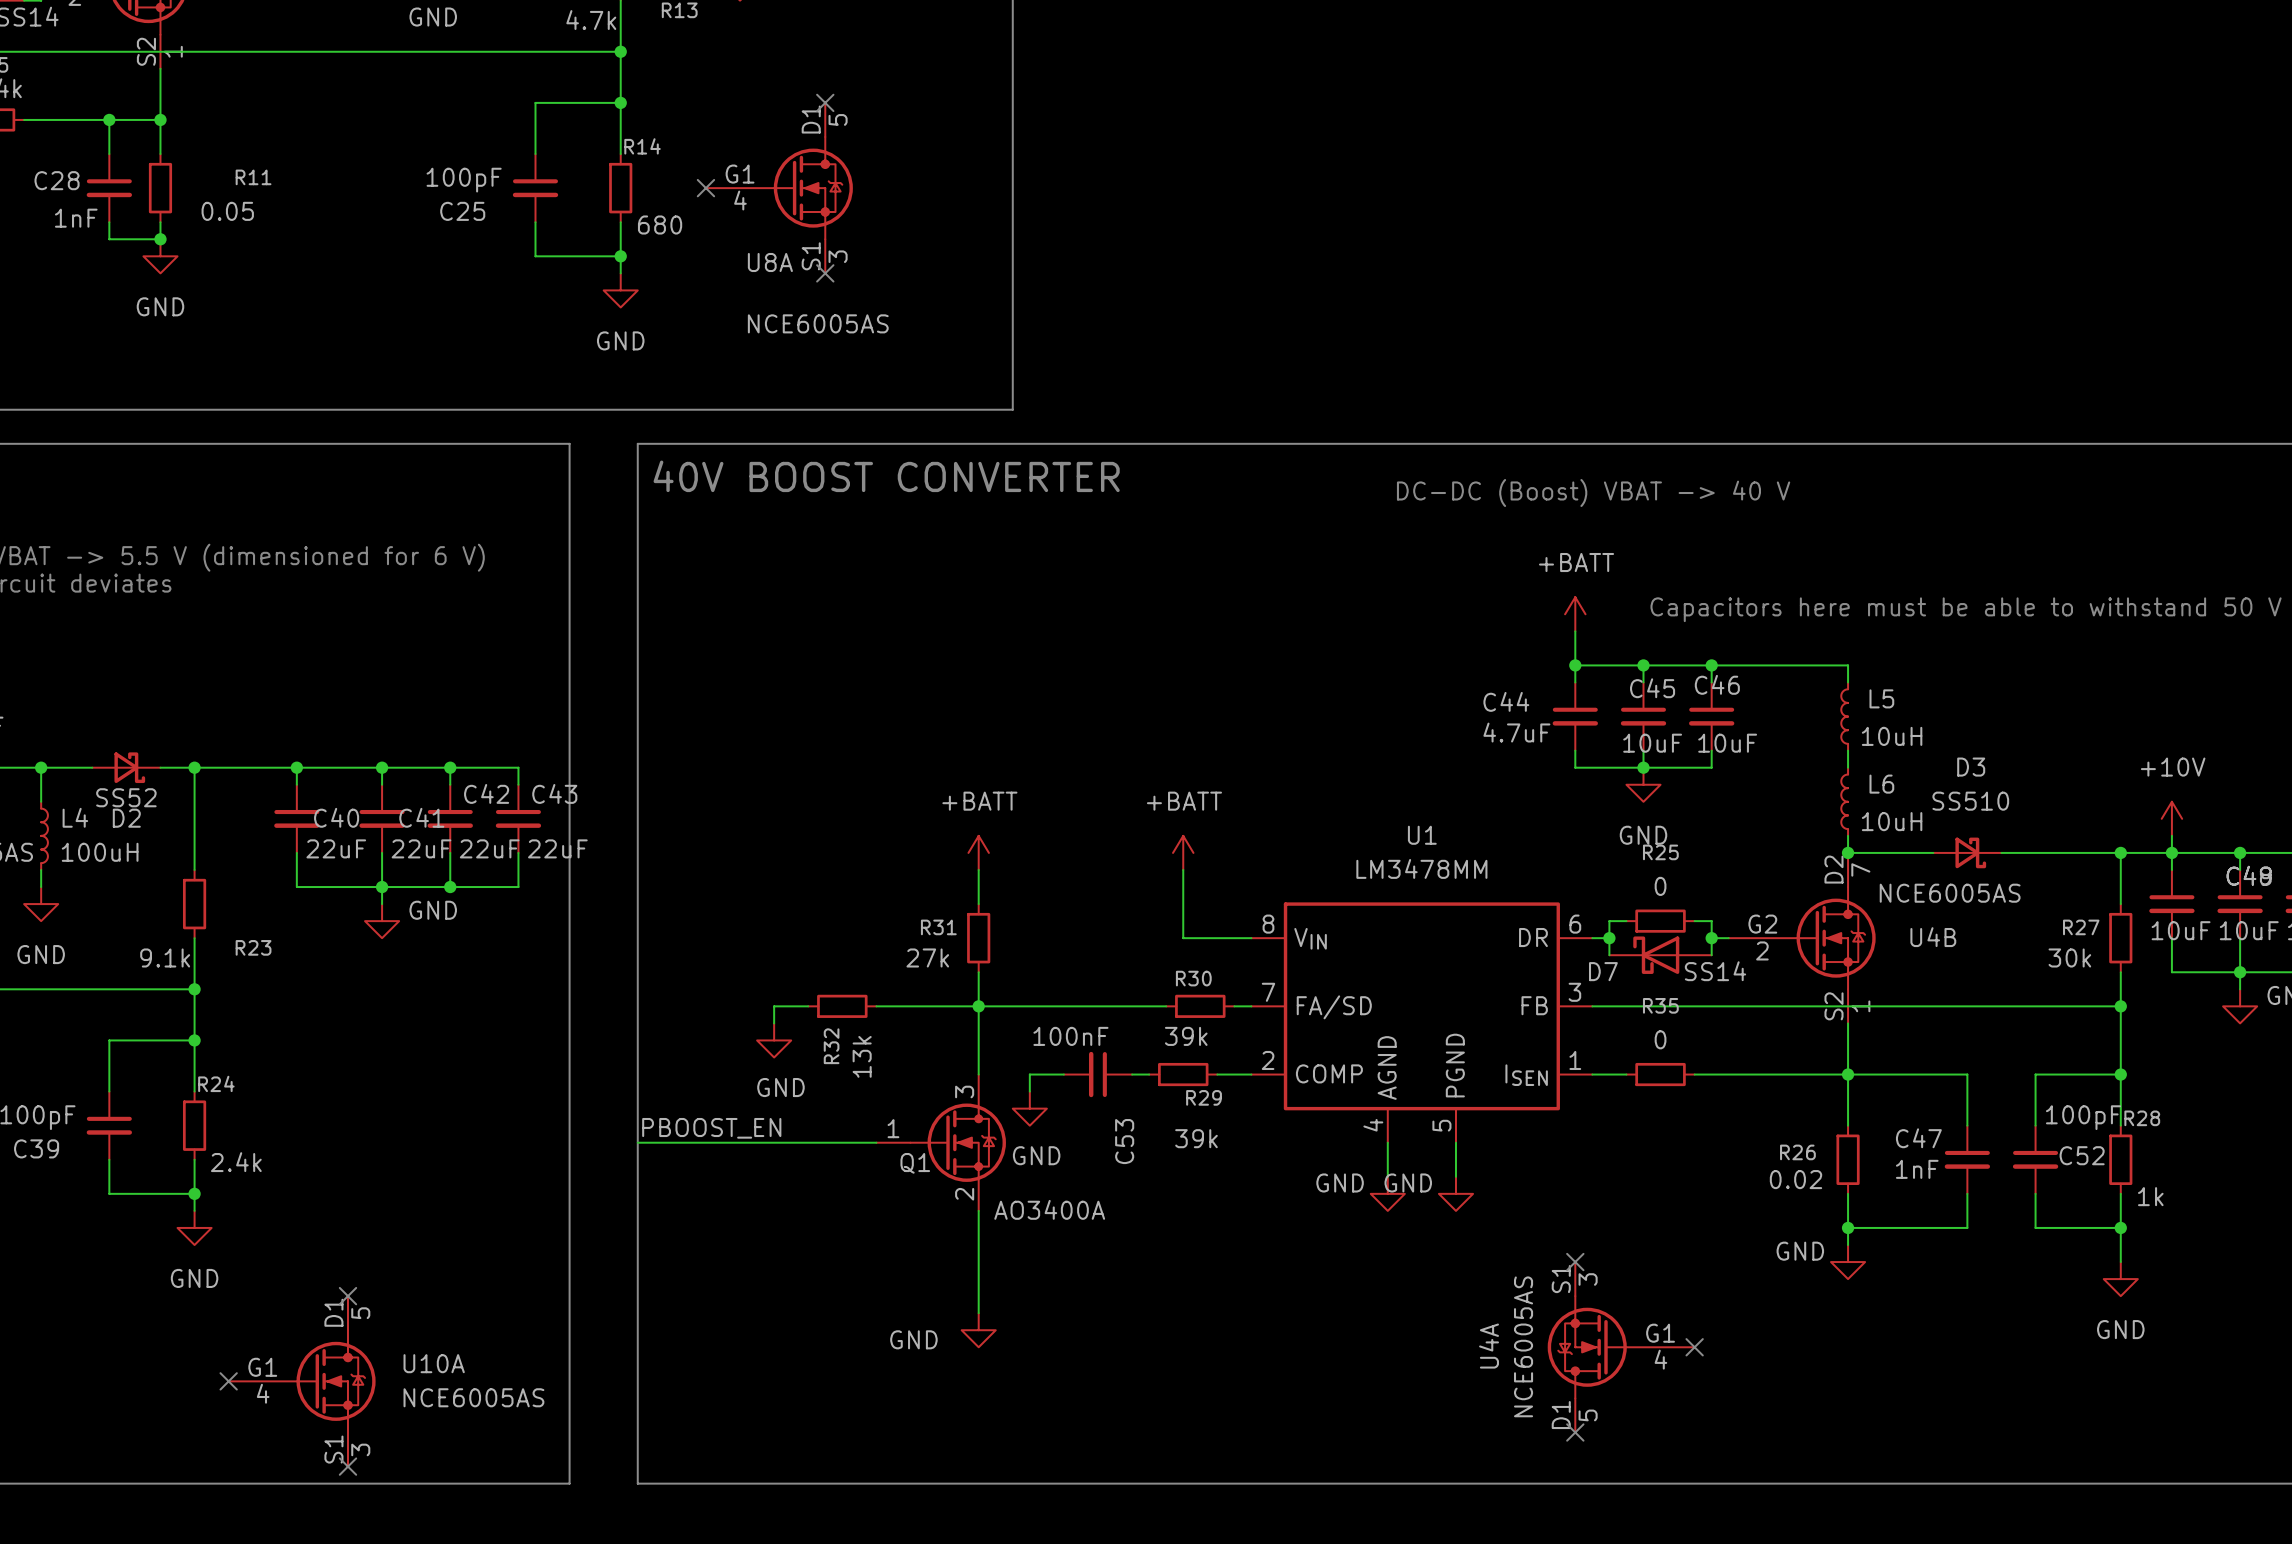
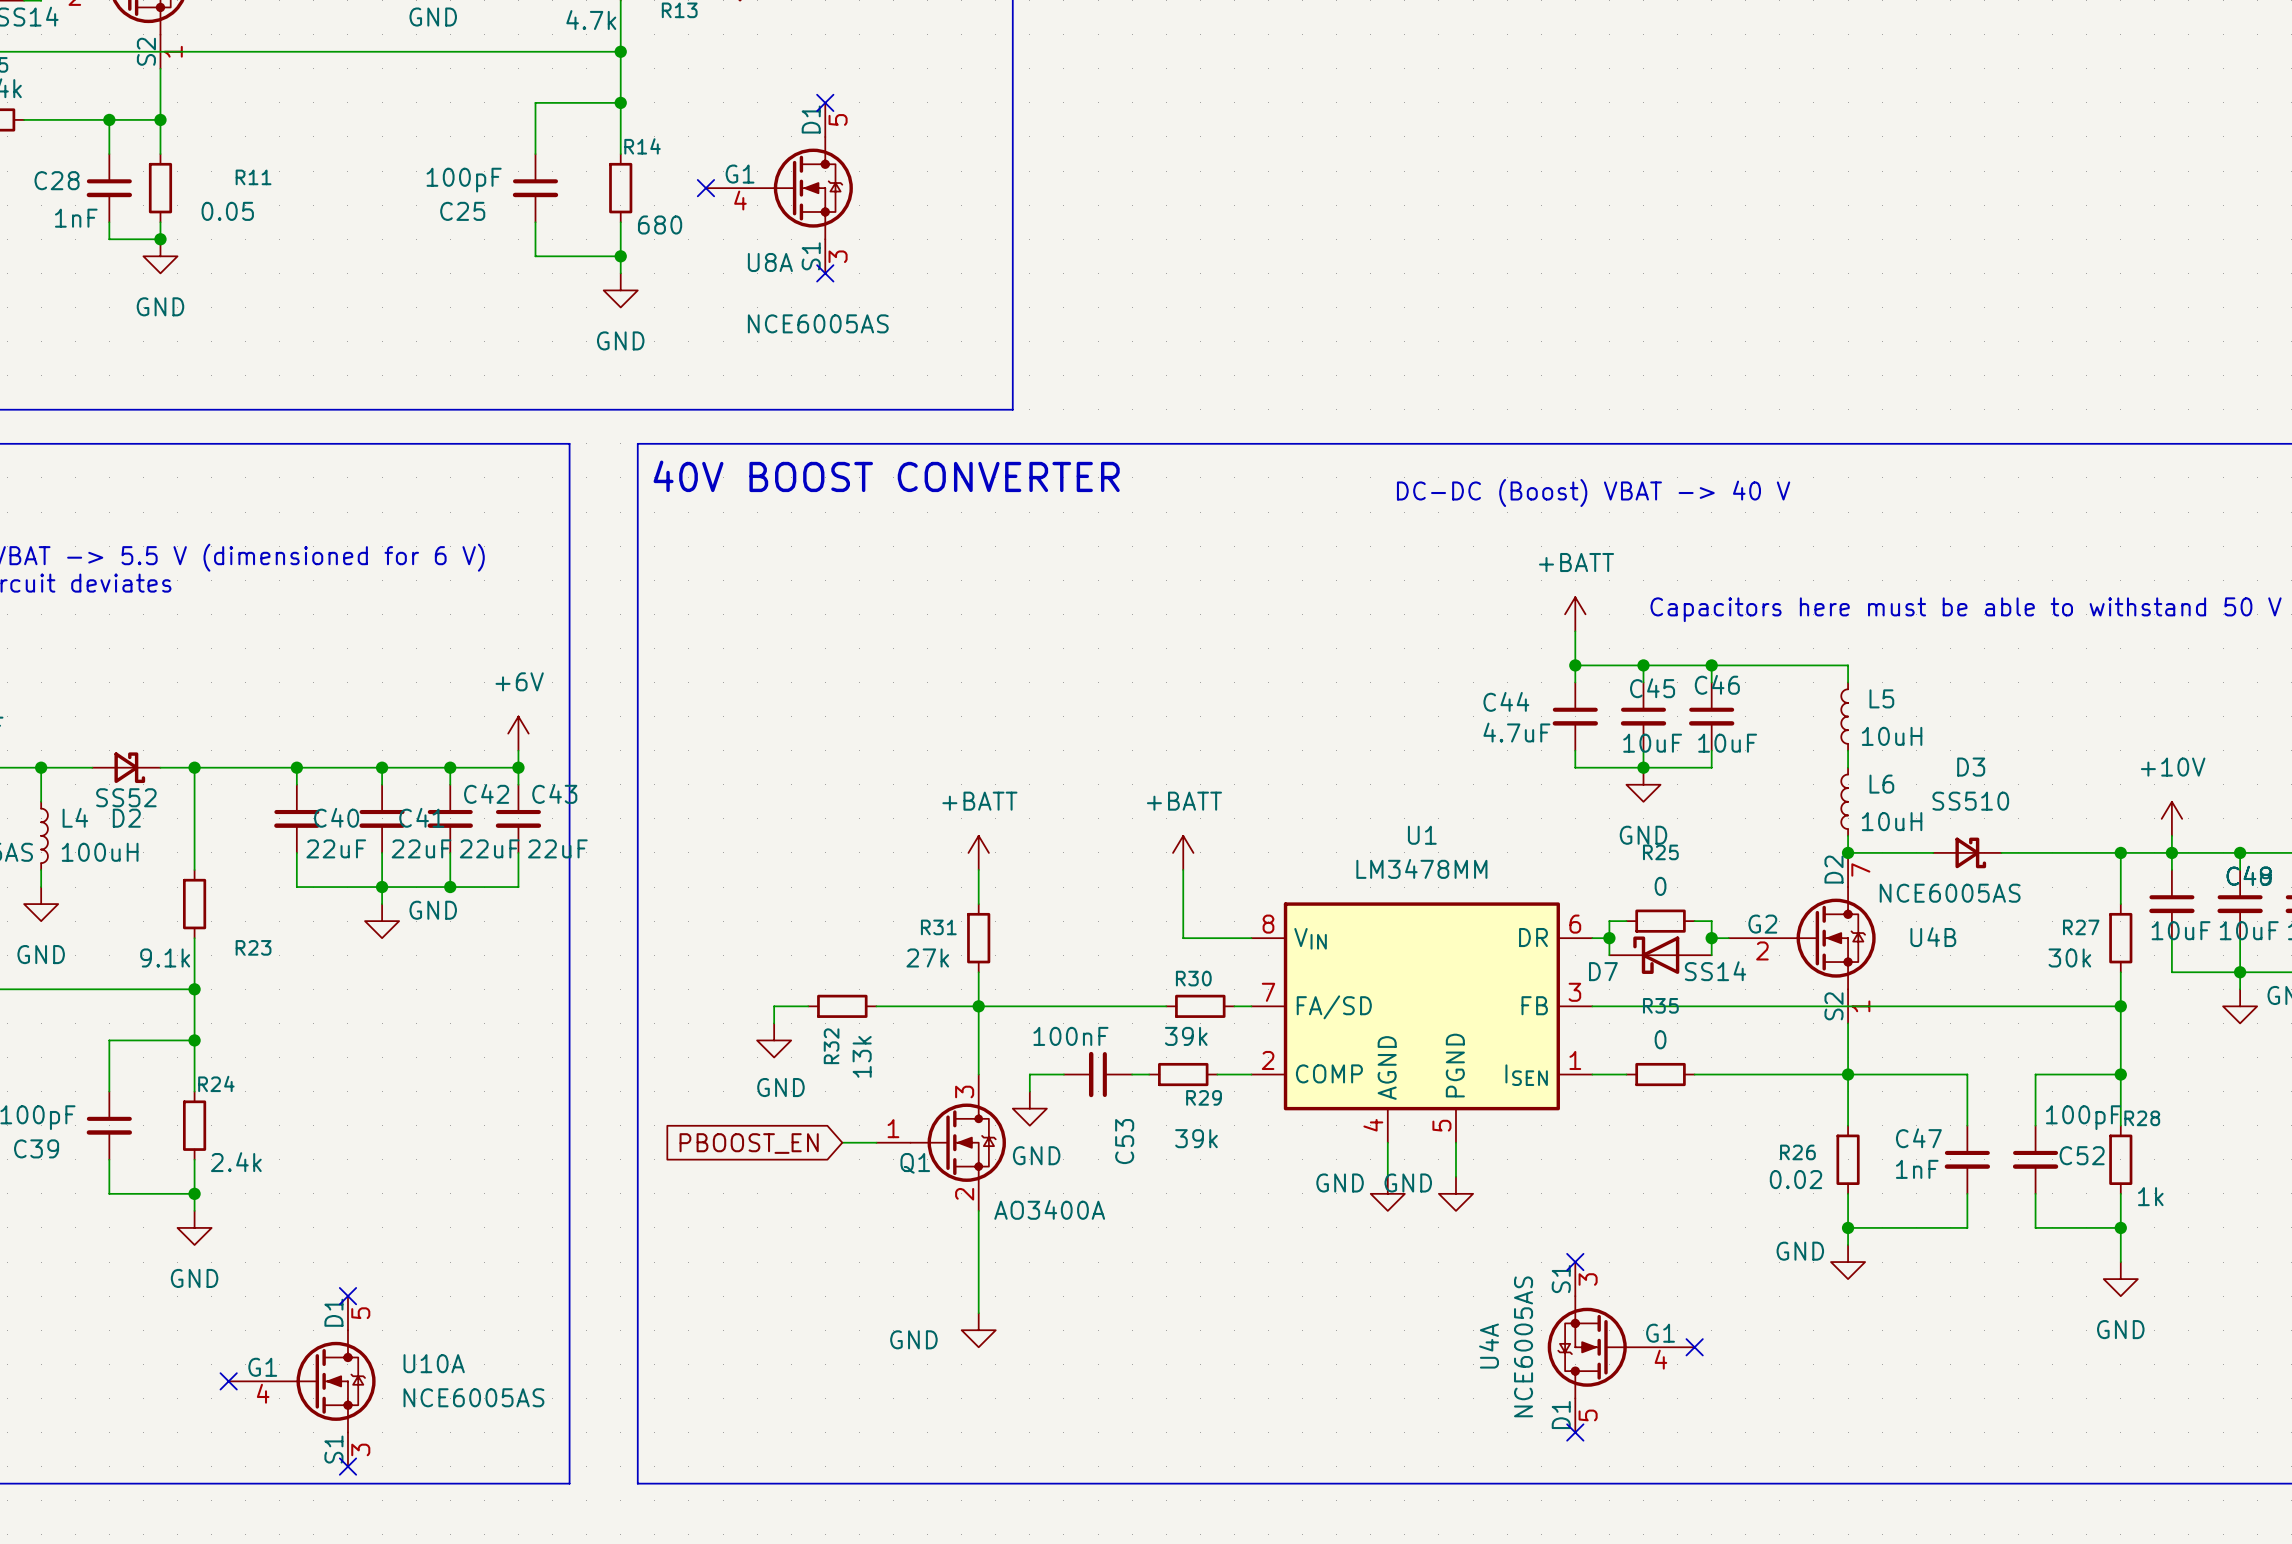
power symbol: none -> +6V (518, 733)
wire: none -> (518, 750) (518, 767)
junction: none -> (518, 767)
label: PBOOST_EN (711, 1128) -> none
wire: (637, 1142) (842, 1142) -> none
global label: none -> PBOOST_EN (749, 1143)

